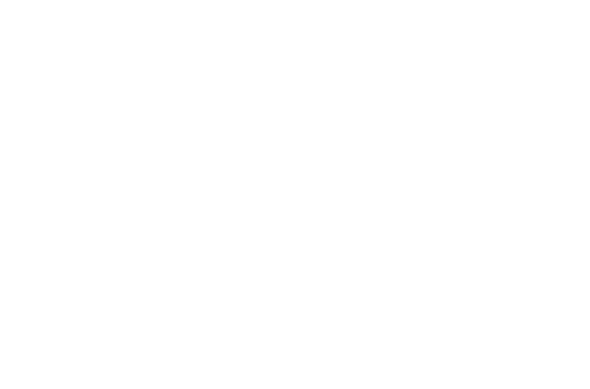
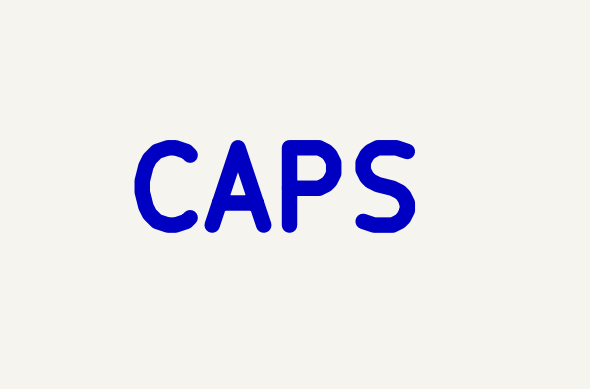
text: none -> CAPS (274, 186)

